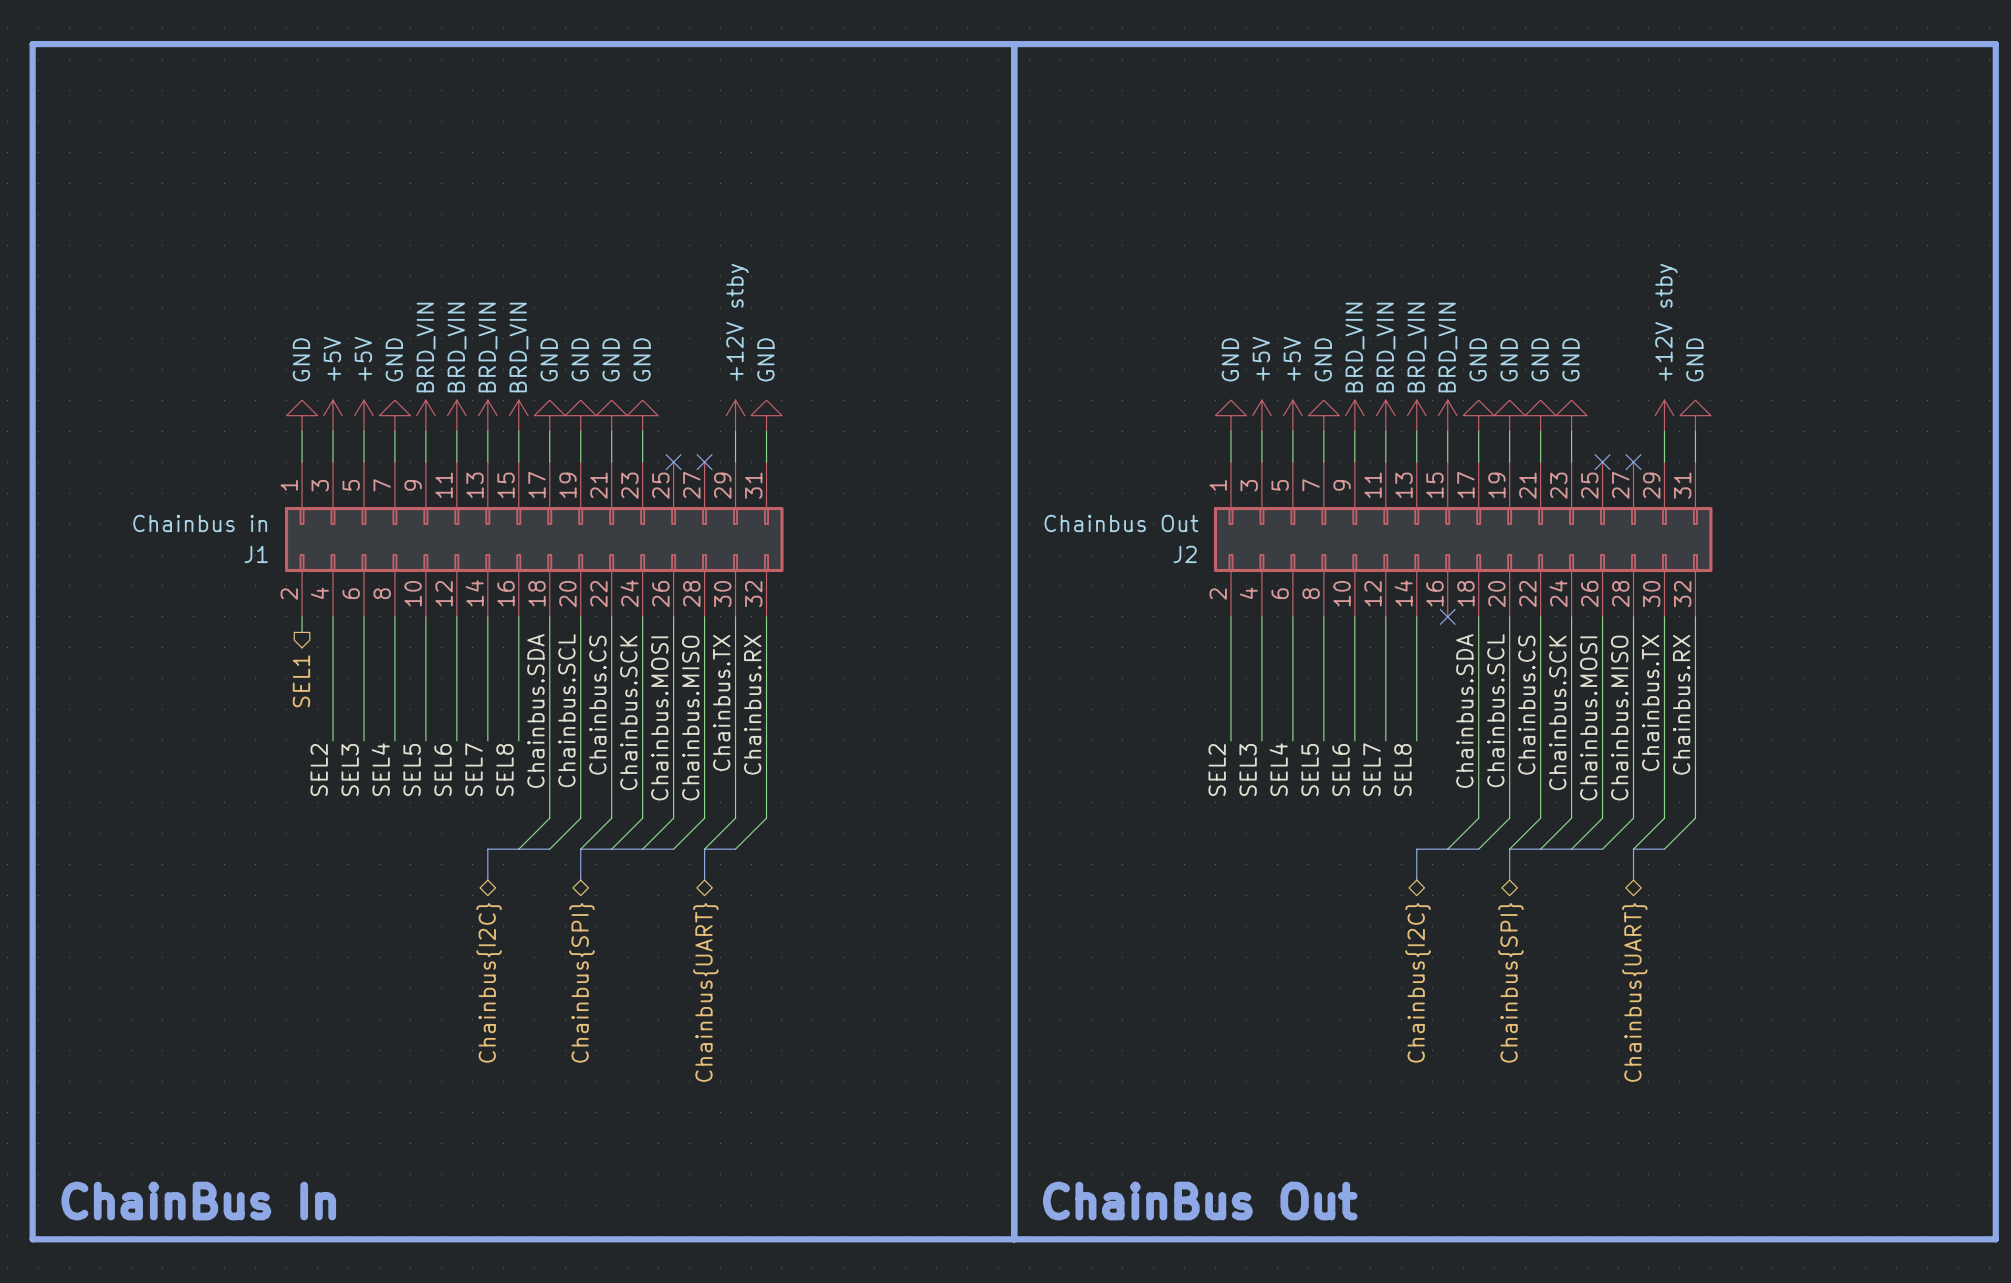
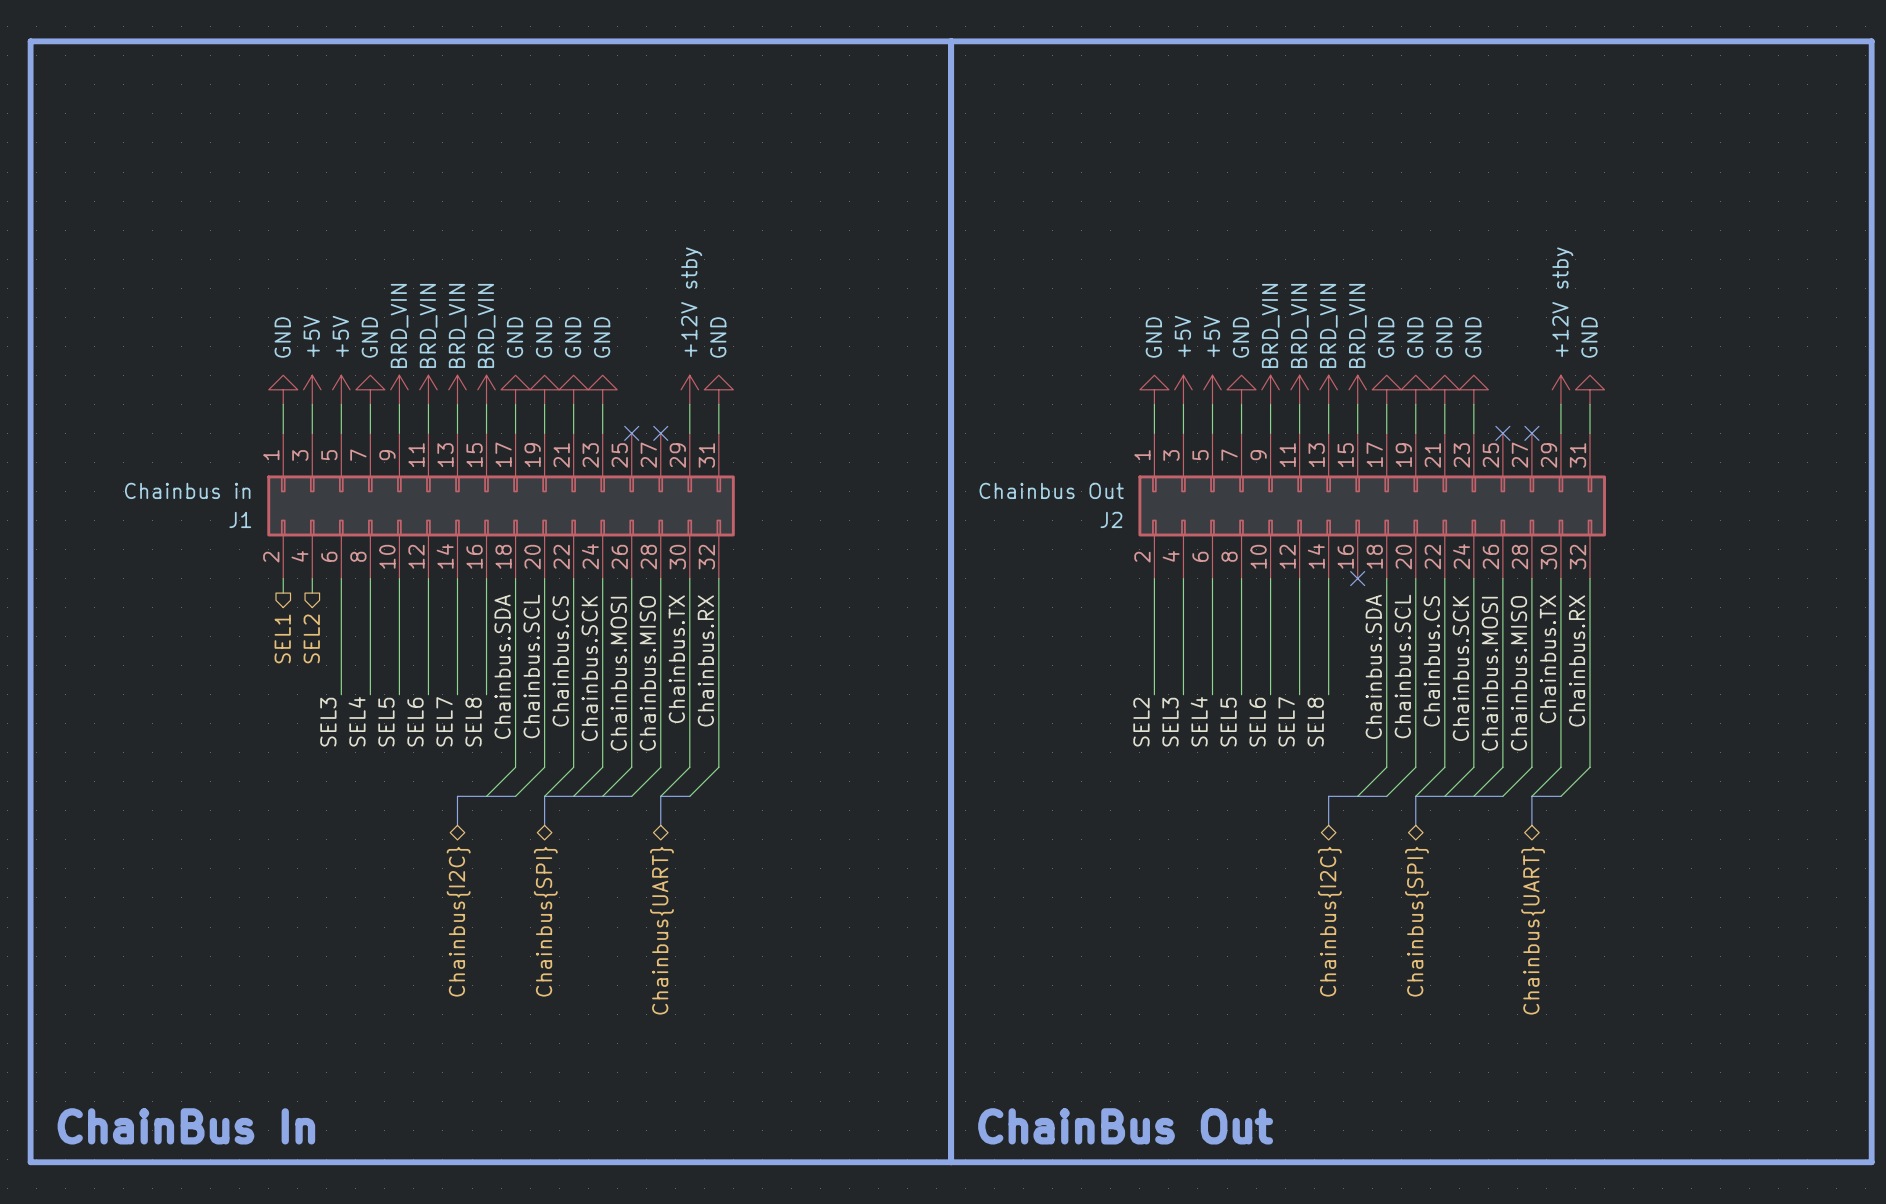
wire: (333, 632) (333, 740) -> none
hierarchical label: none -> SEL2 (311, 638)
label: SEL2 (319, 770) -> none

